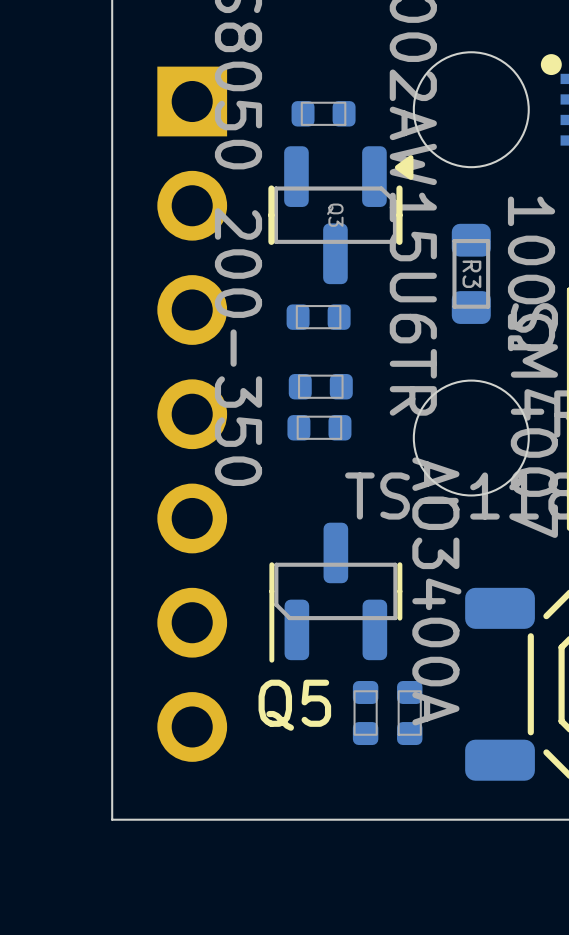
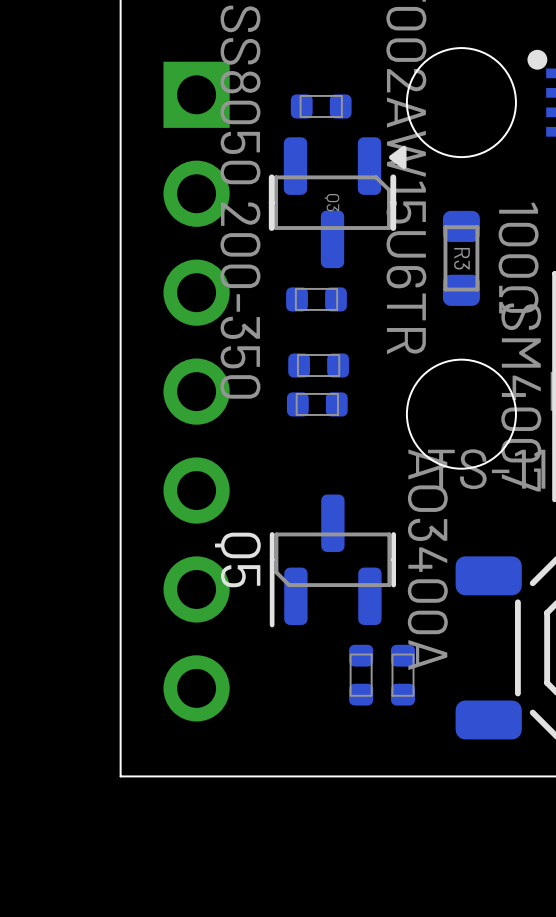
Q5 name rotation: 0° (294, 705) -> 90° clockwise (237, 559)
Q5 name position: Q5 (294, 705) -> Q5 (237, 559)

